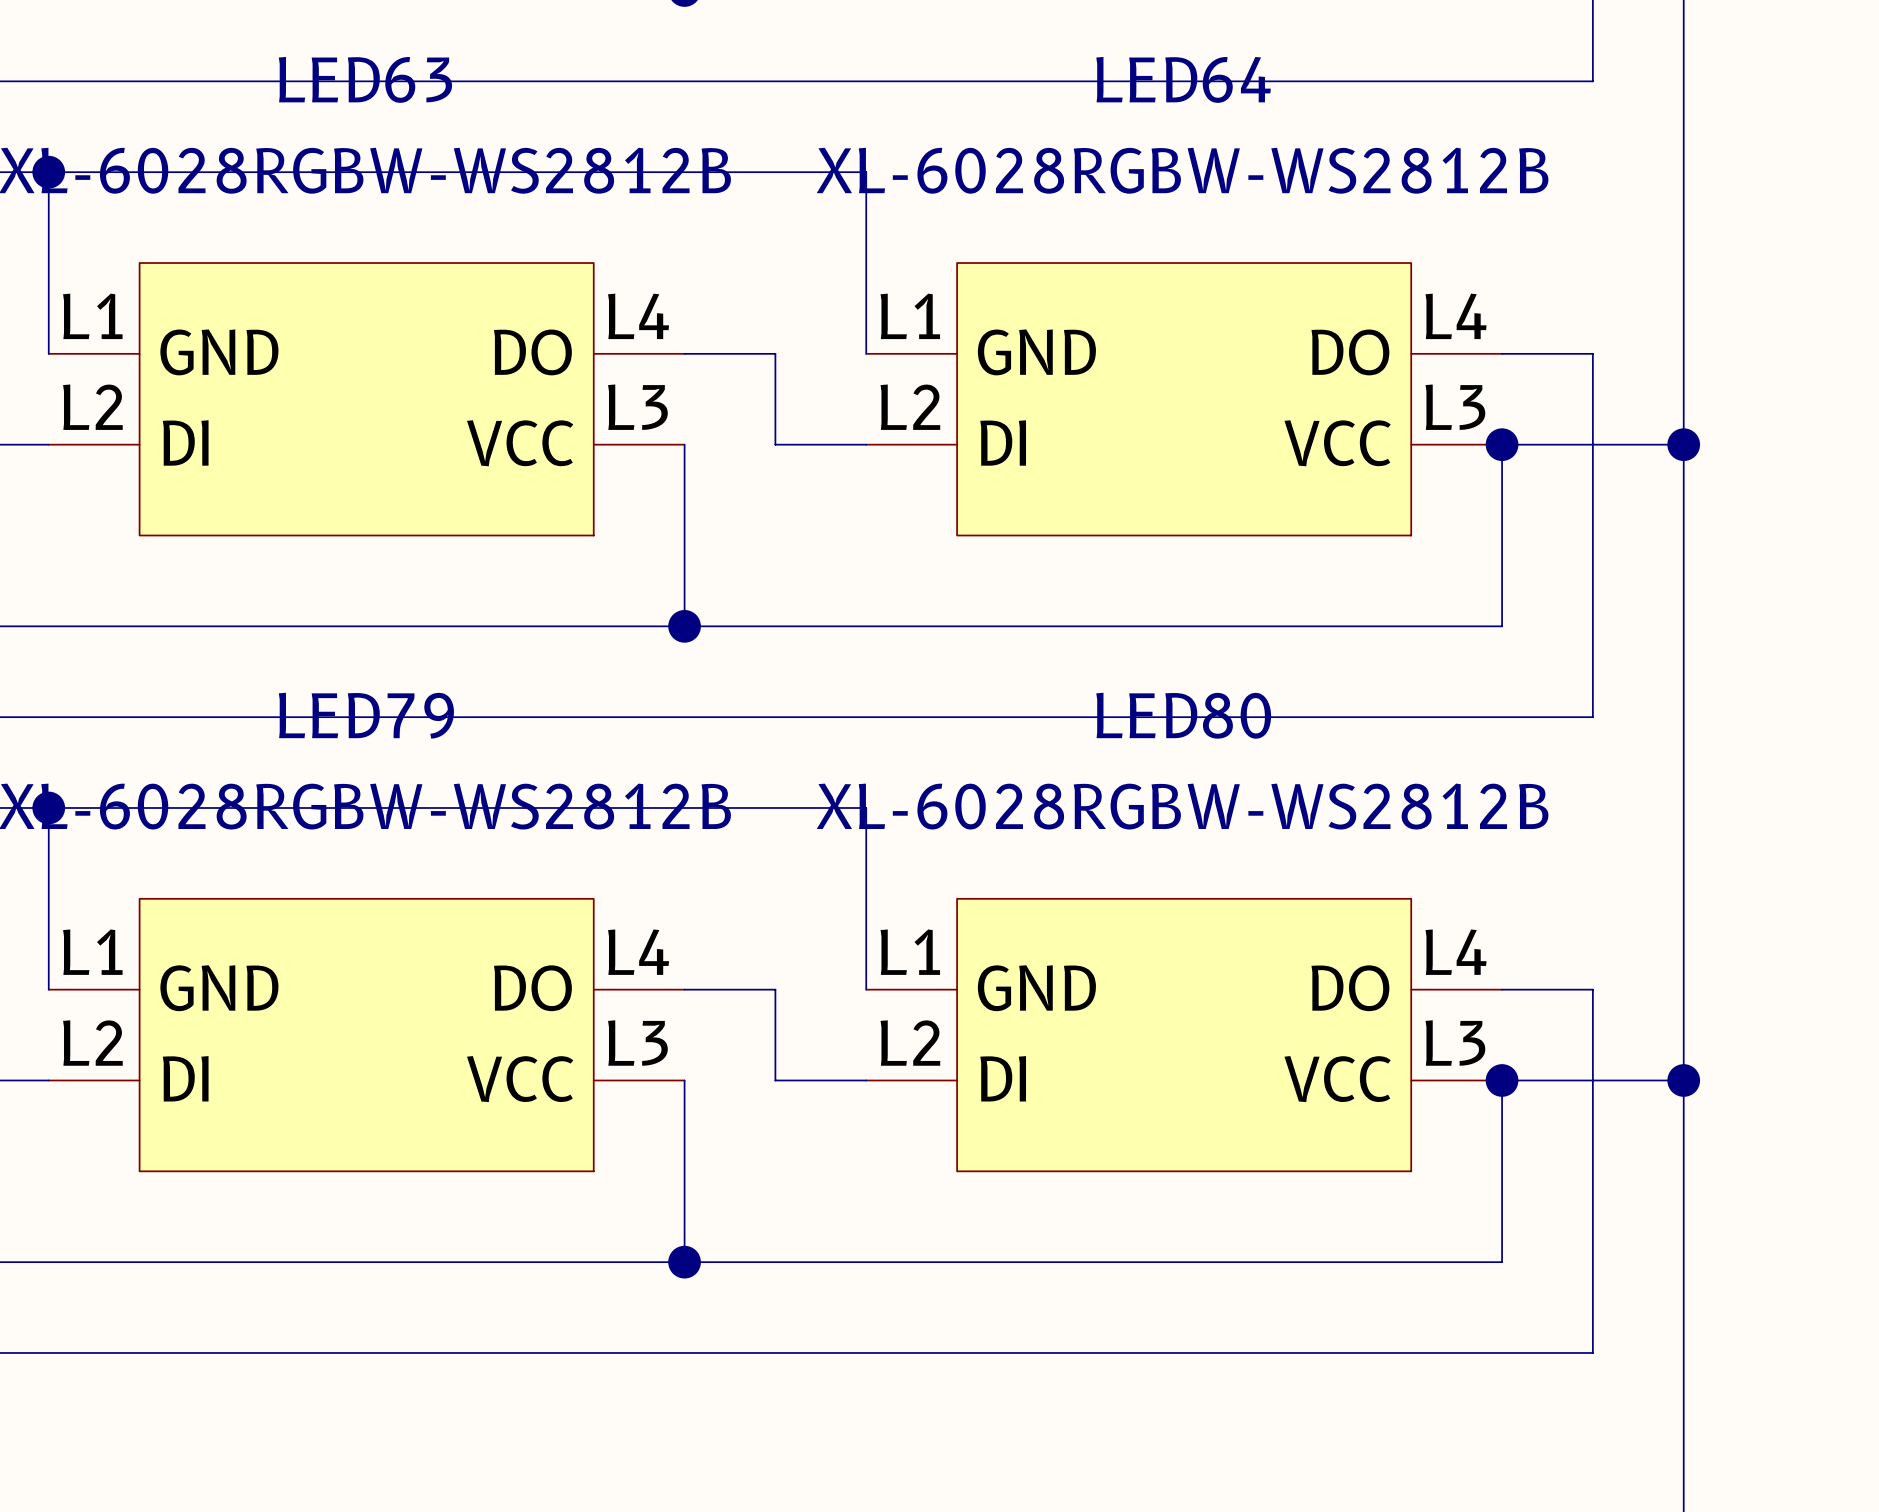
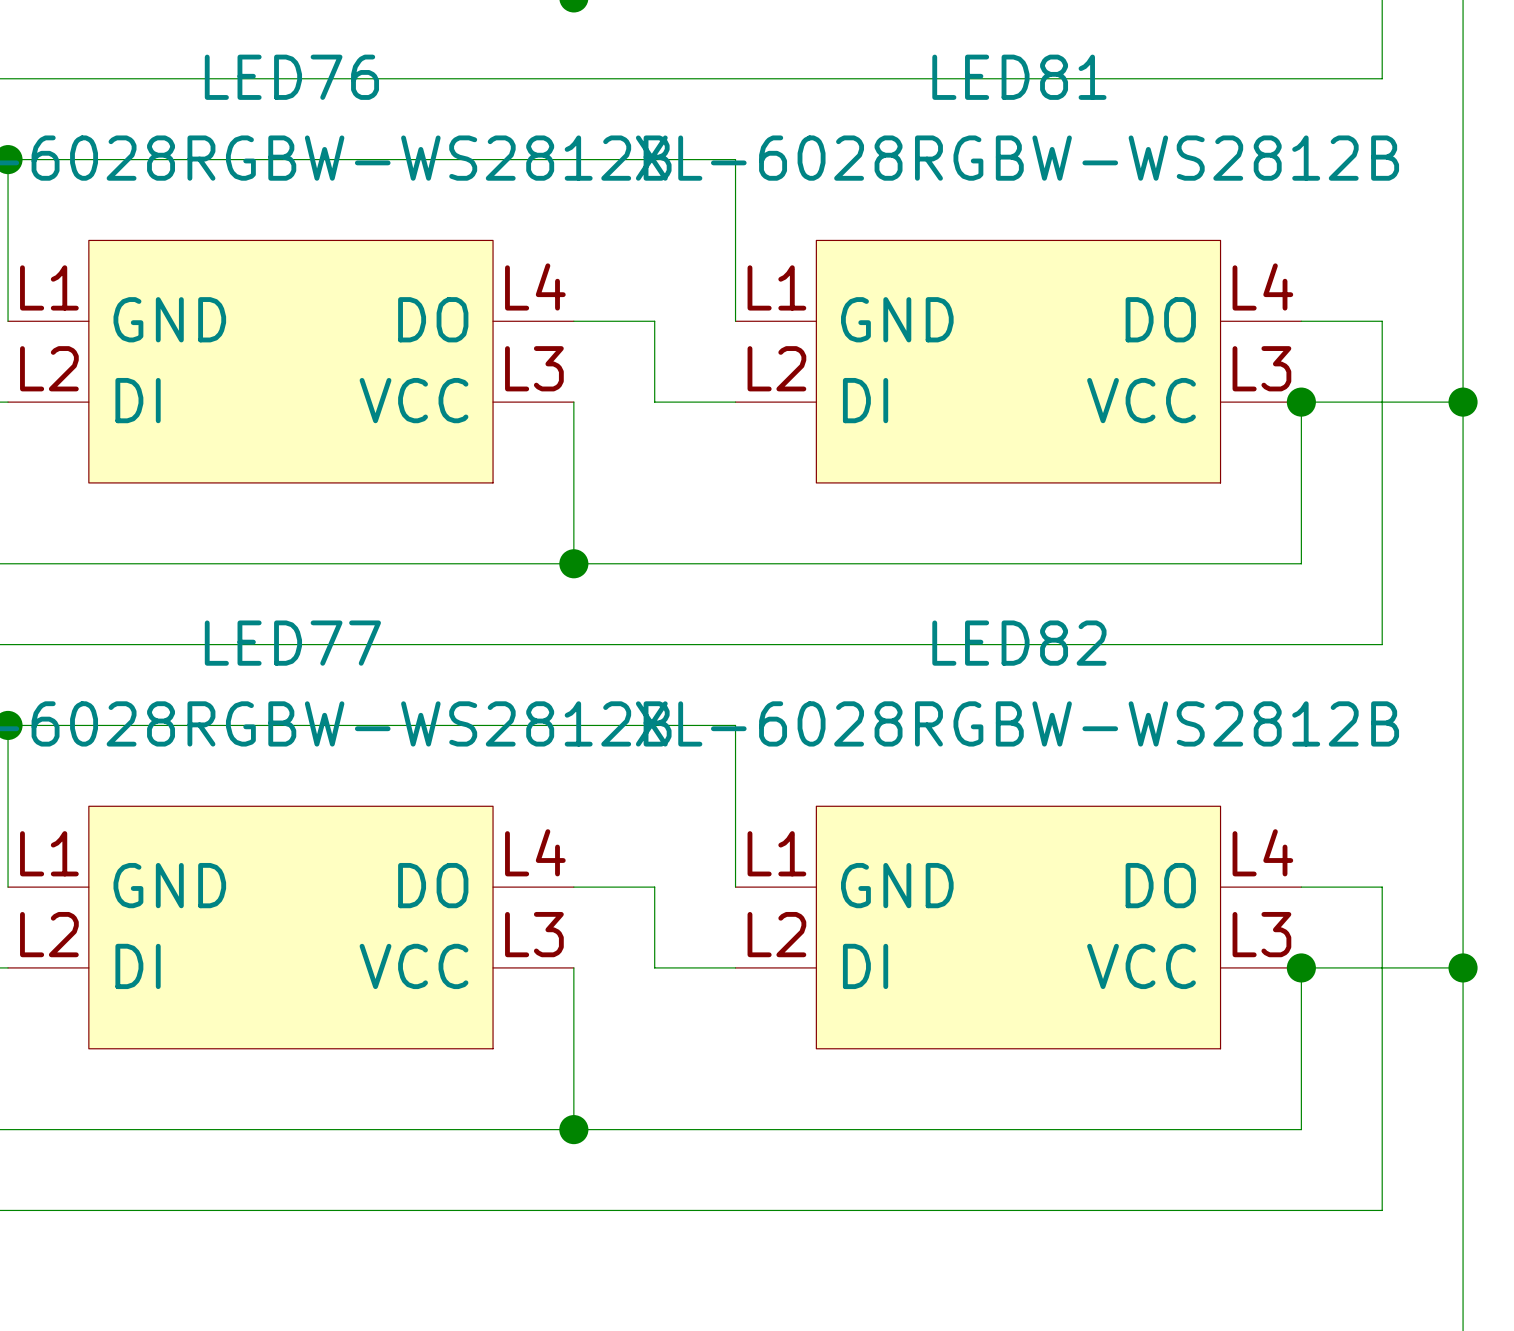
LED63 name: LED63 (365, 79) -> LED76 (291, 77)
LED64 name: LED64 (1183, 79) -> LED81 (1019, 77)
LED79 name: LED79 (366, 715) -> LED77 (292, 643)
LED80 name: LED80 (1183, 715) -> LED82 (1019, 643)

